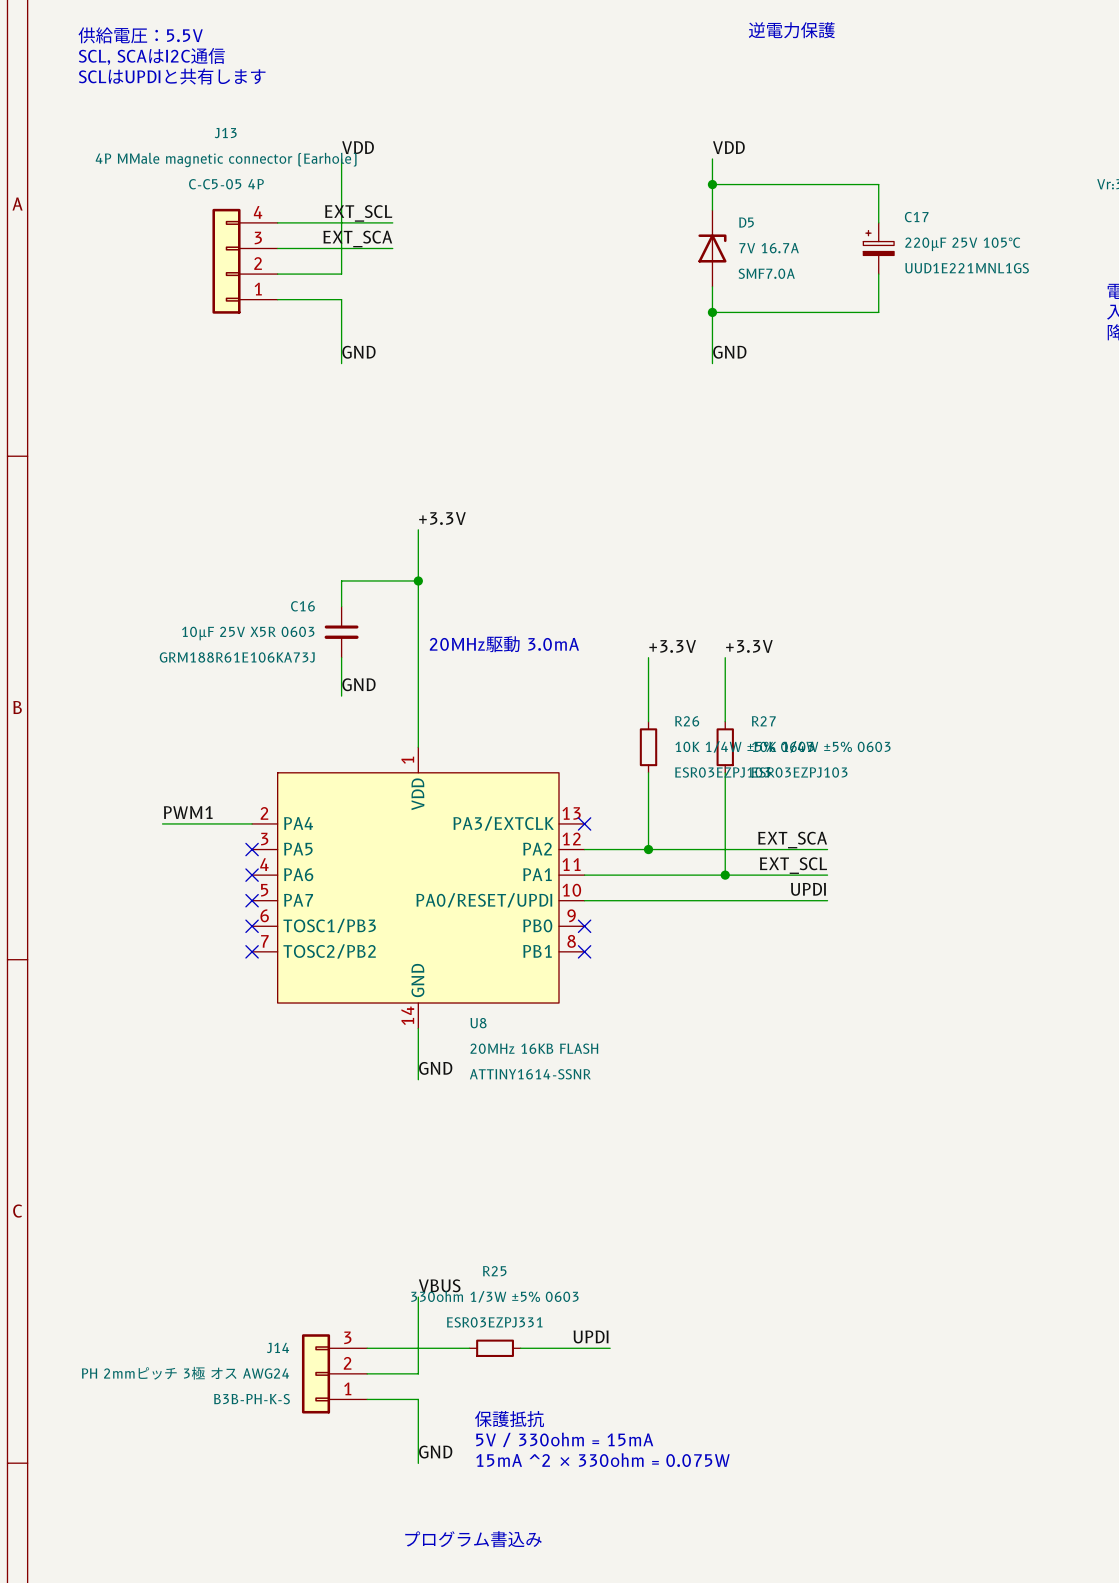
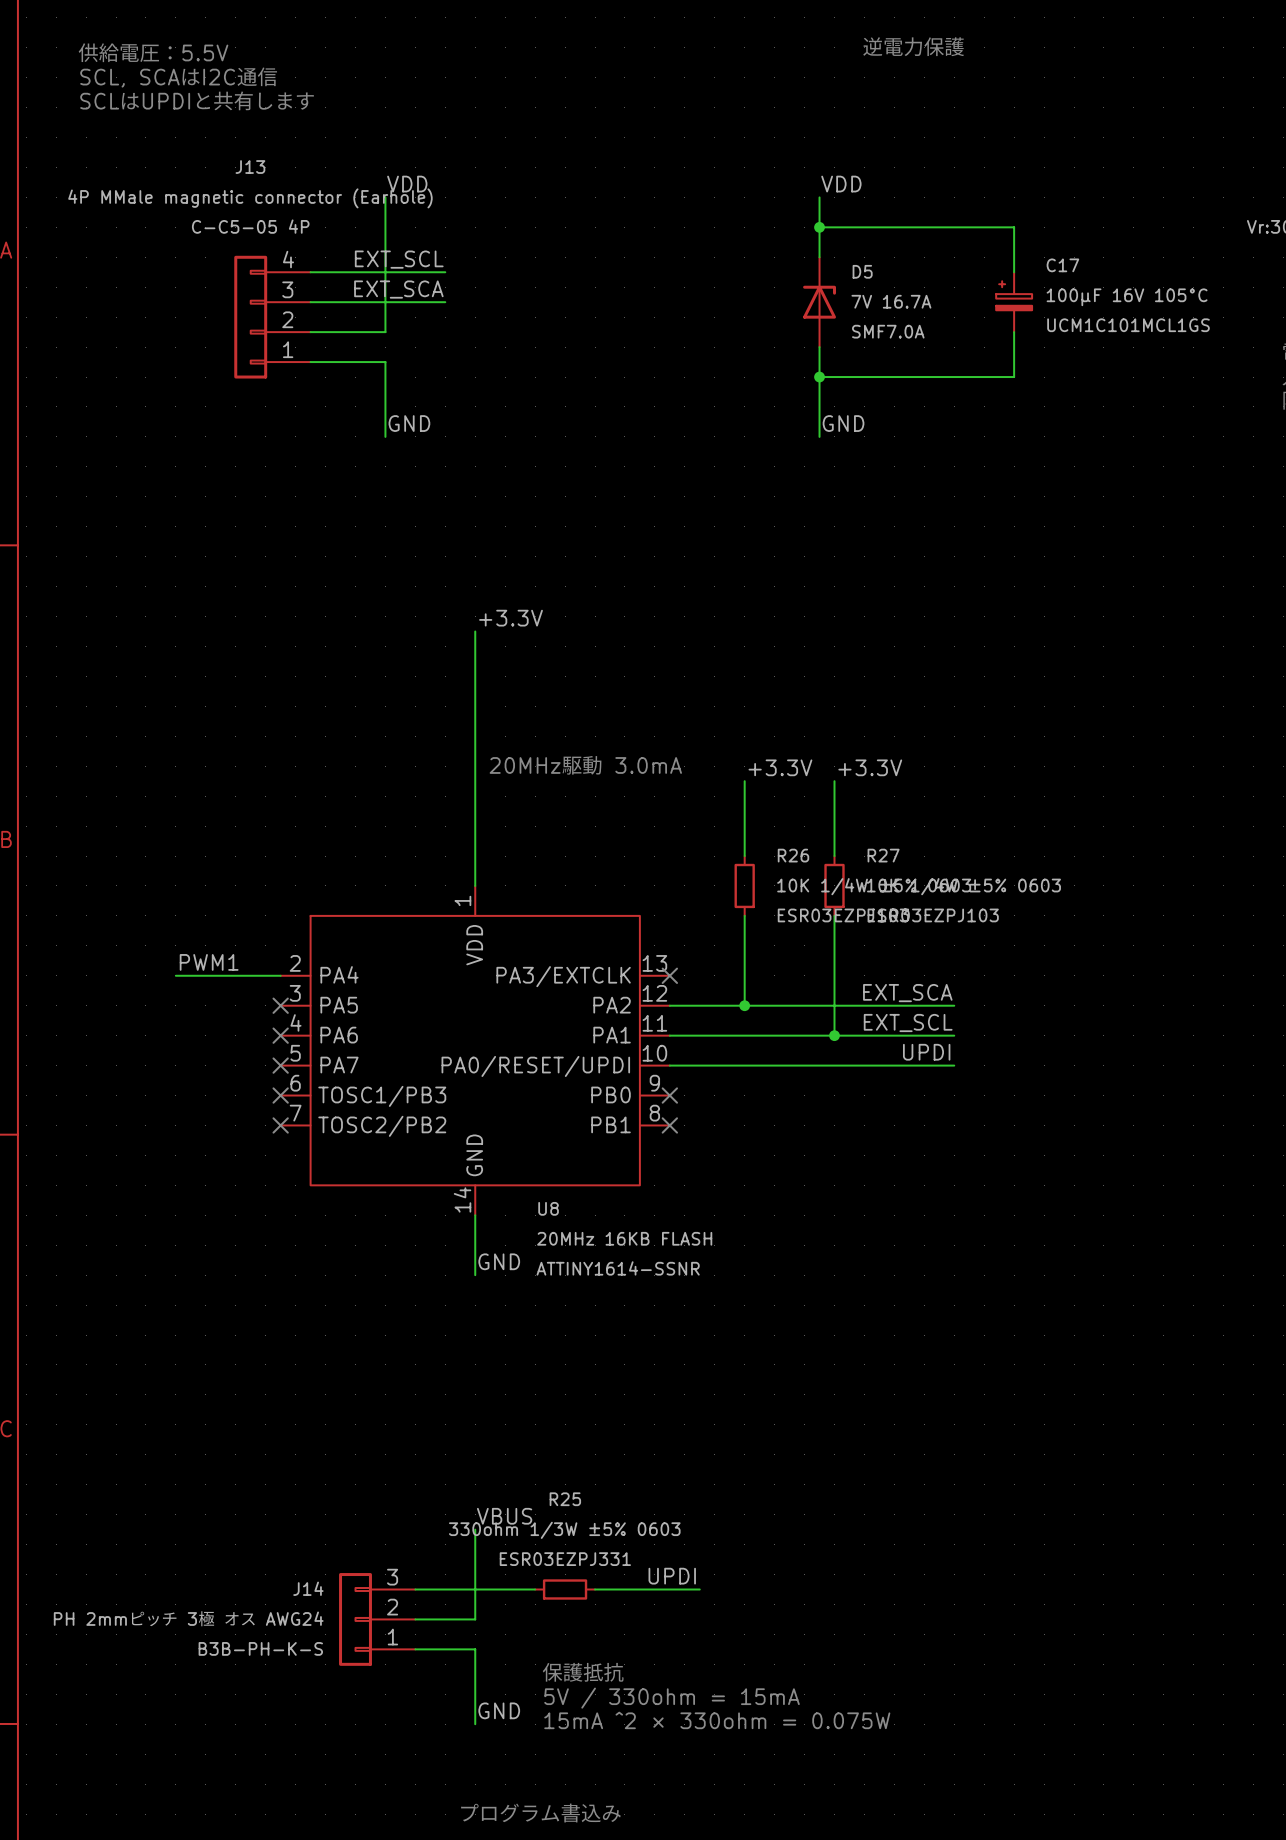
C17 value: 220µF 25V 105°C (962, 244) -> 100µF 16V 105°C (1127, 297)
C17 text: UUD1E221MNL1GS (967, 268) -> UCM1C101MCL1GS (1128, 325)
wire: (418, 580) (341, 580) (341, 606) -> none
junction: (418, 580) -> none
C16: 10µF 25V X5R 0603 (341, 632) -> none
wire: (341, 657) (341, 696) -> none
label: GND (358, 684) -> none

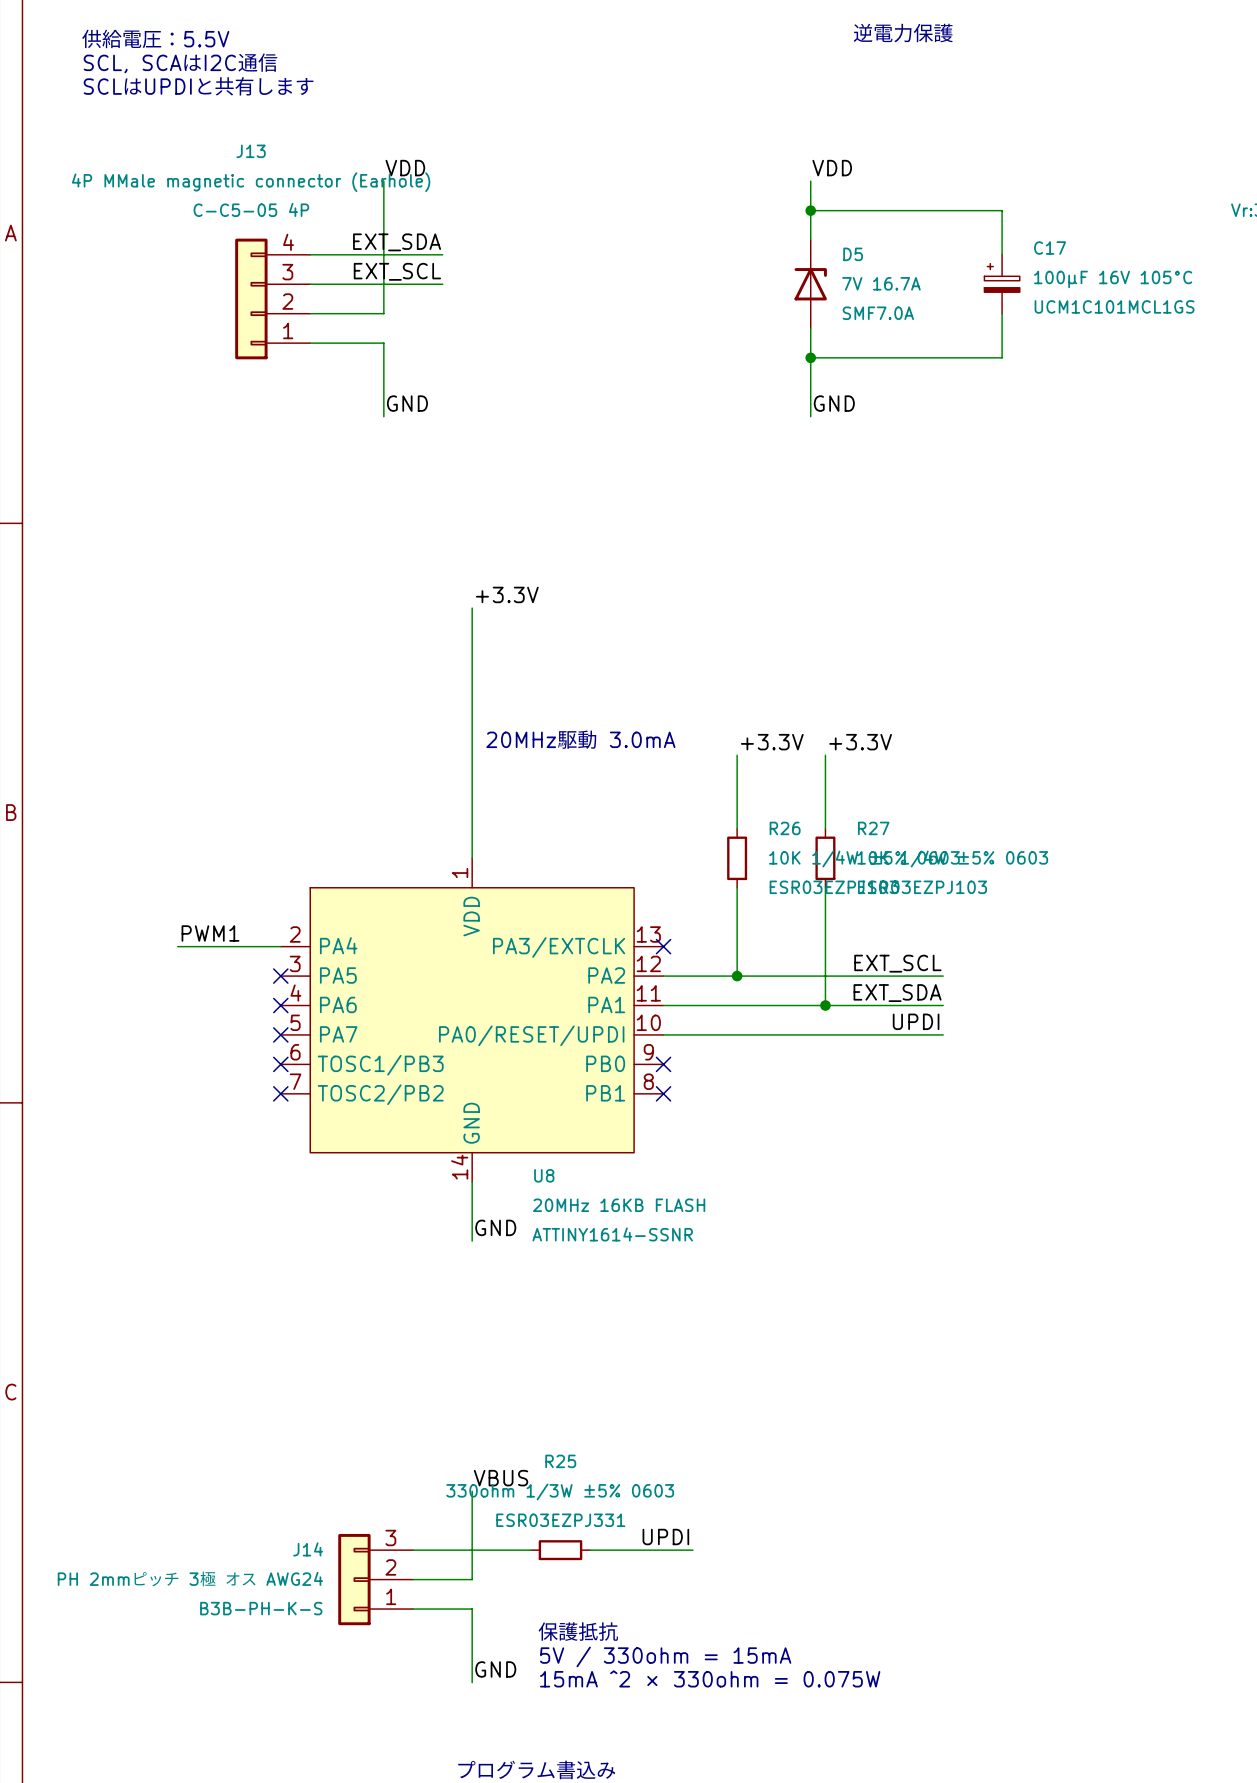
label: EXT_SCL (399, 259) -> EXT_SDA (397, 242)
label: EXT_SCA (398, 289) -> EXT_SCL (397, 271)
label: EXT_SCA (907, 993) -> EXT_SCL (897, 963)
label: EXT_SCL (908, 1023) -> EXT_SDA (897, 993)

